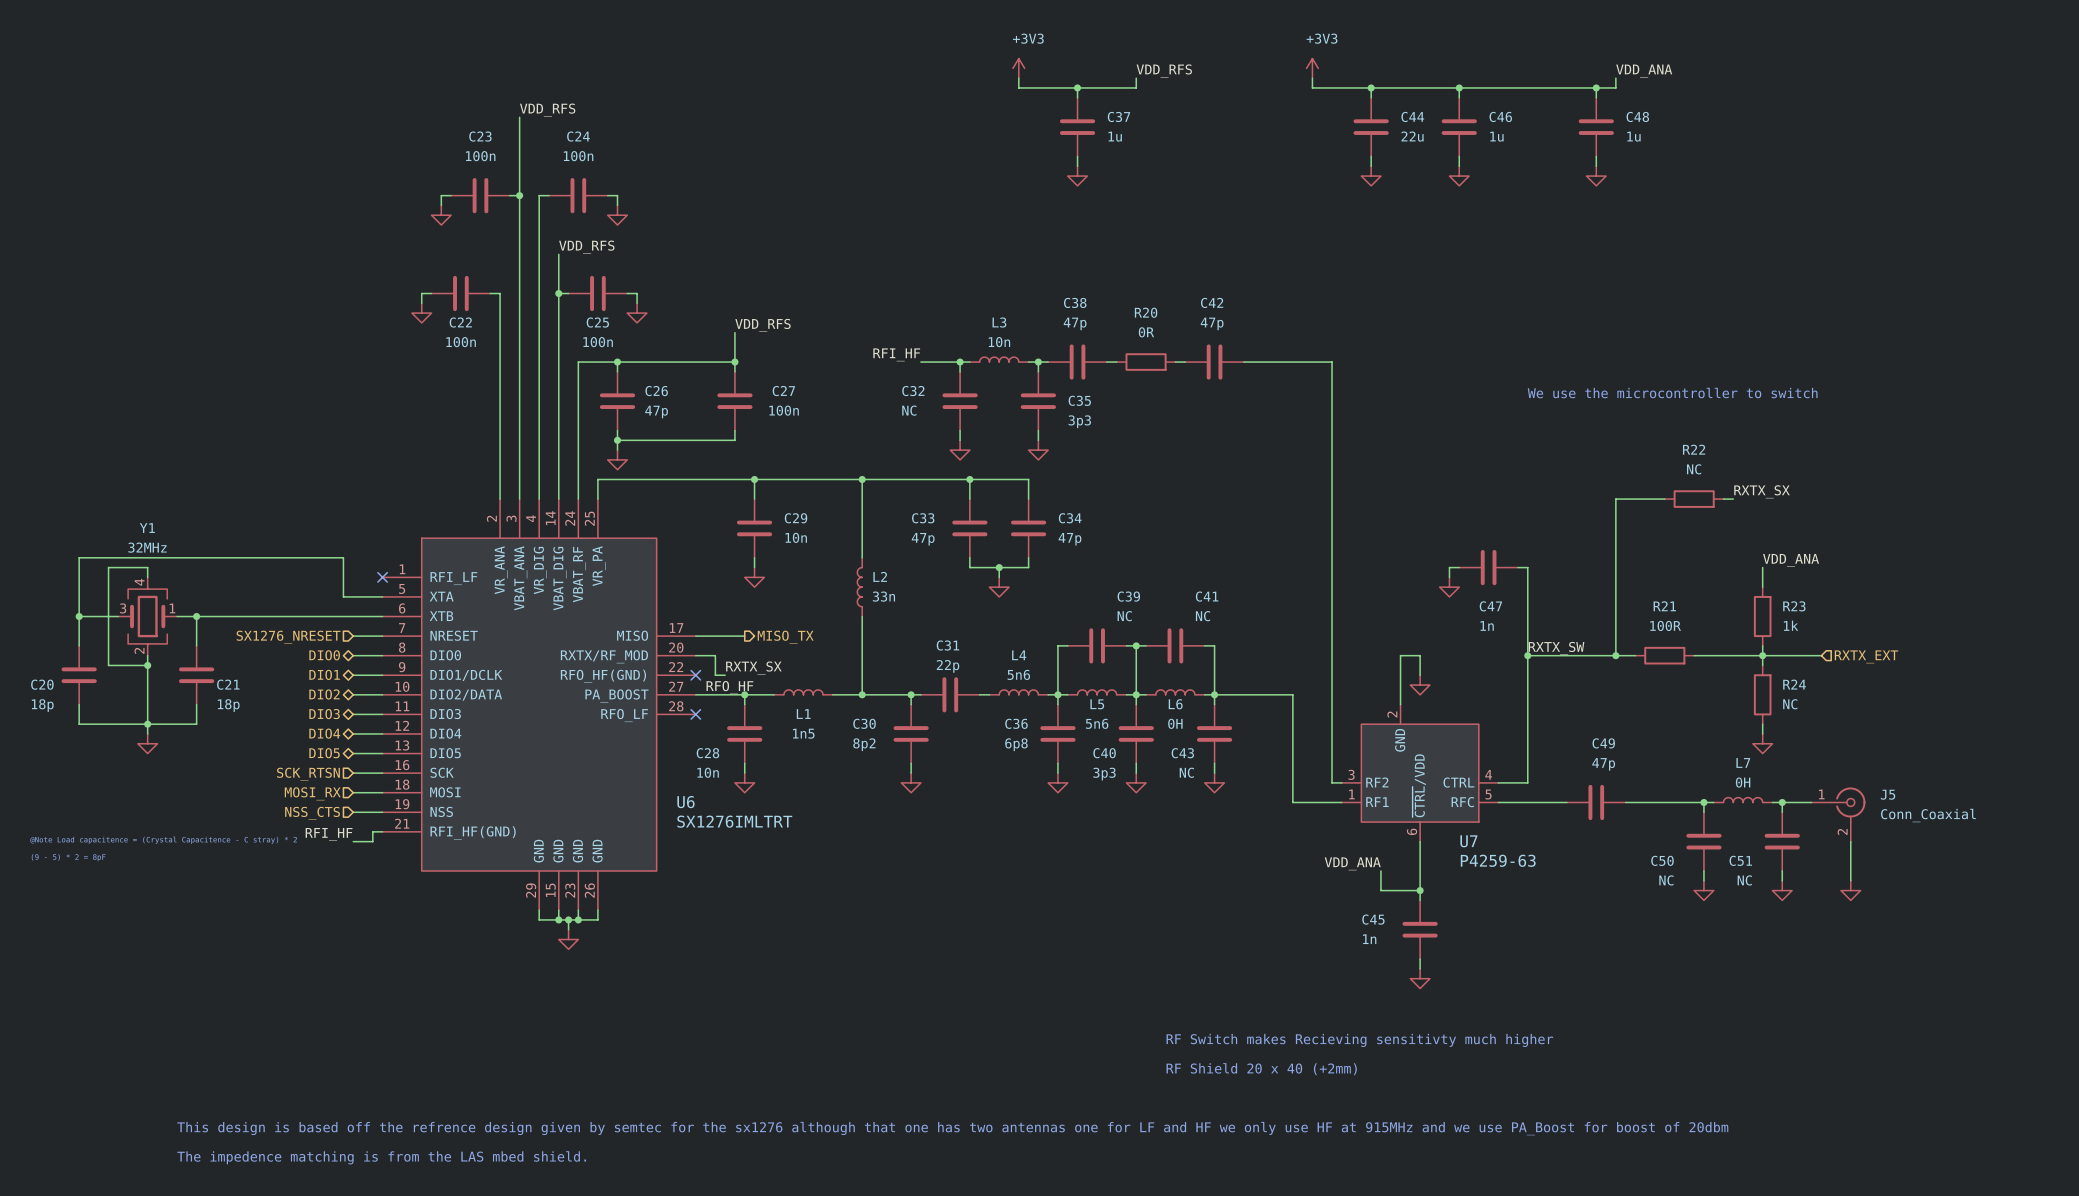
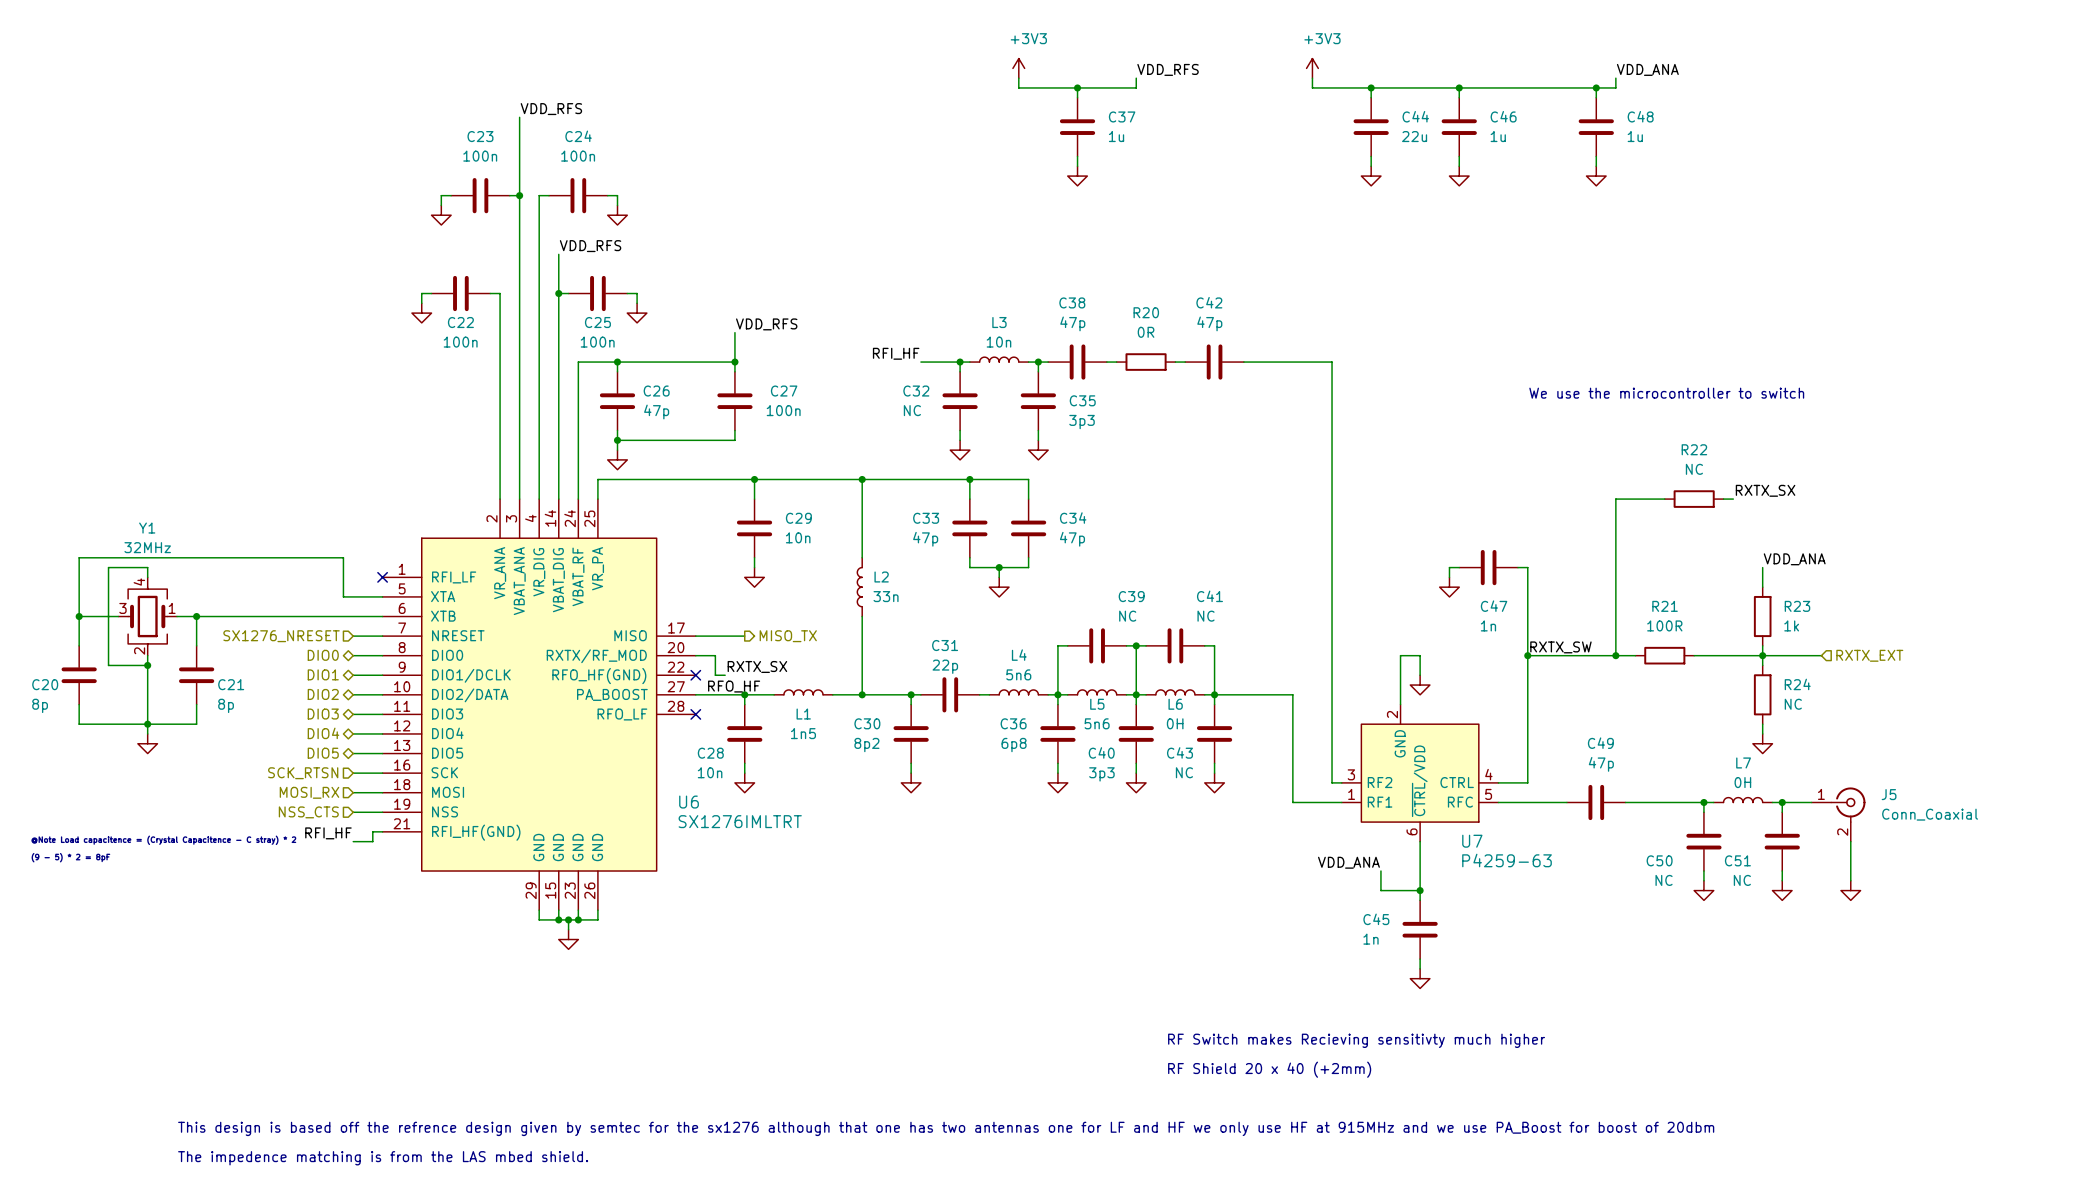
C20 value: 18p (42, 705) -> 8p (40, 705)
C21 value: 18p (228, 705) -> 8p (226, 705)

